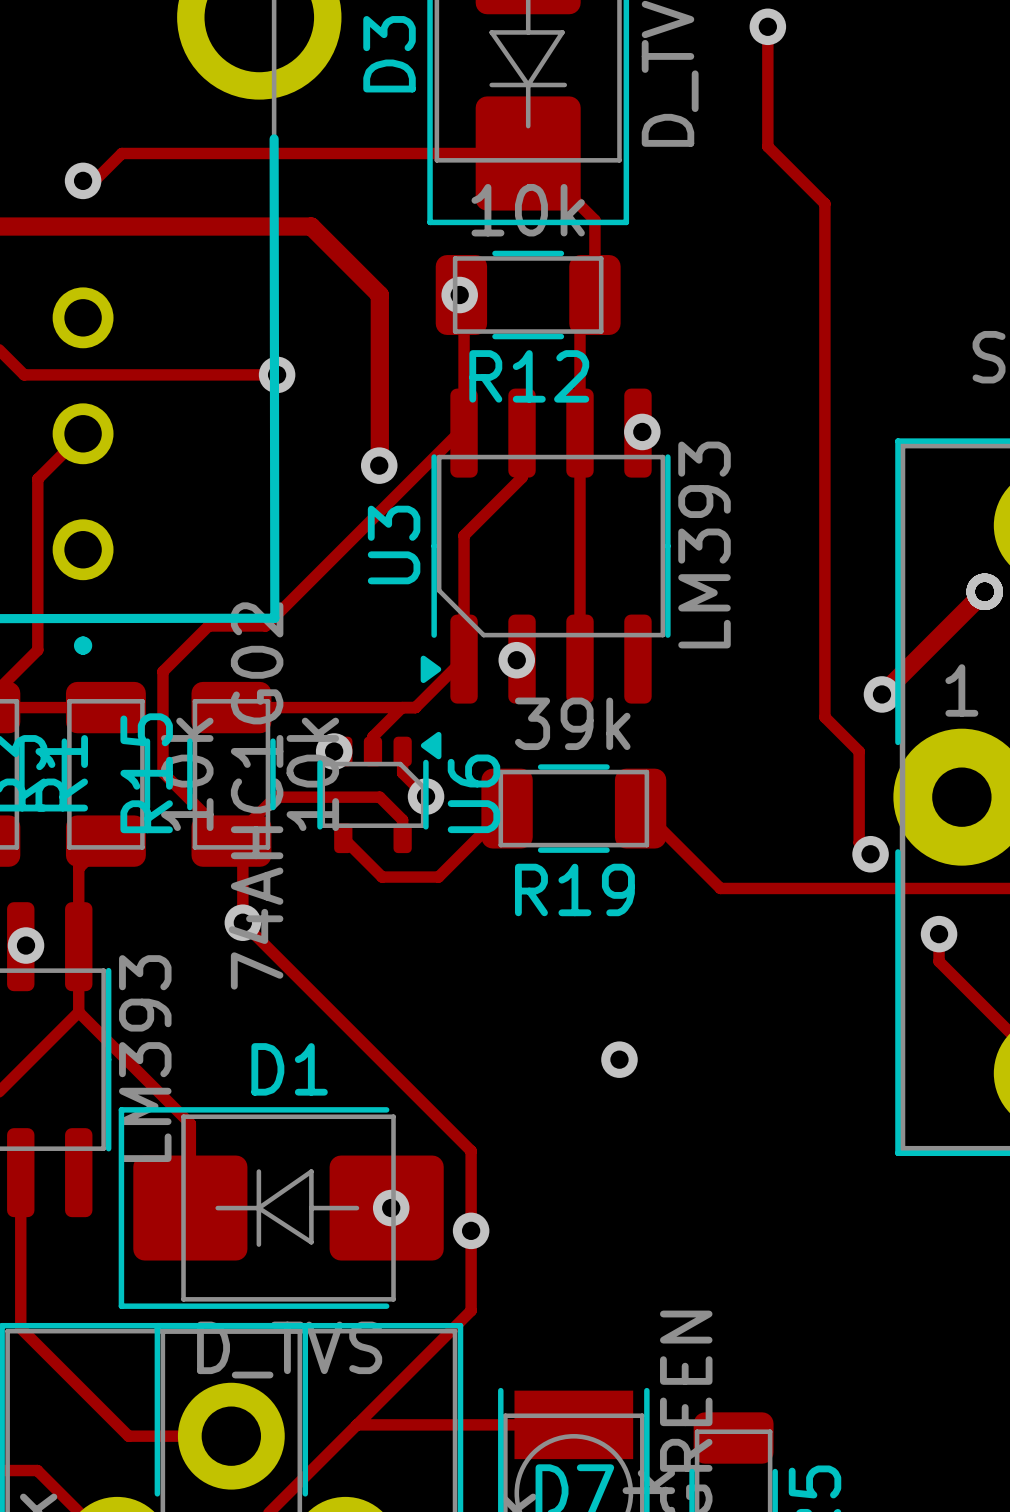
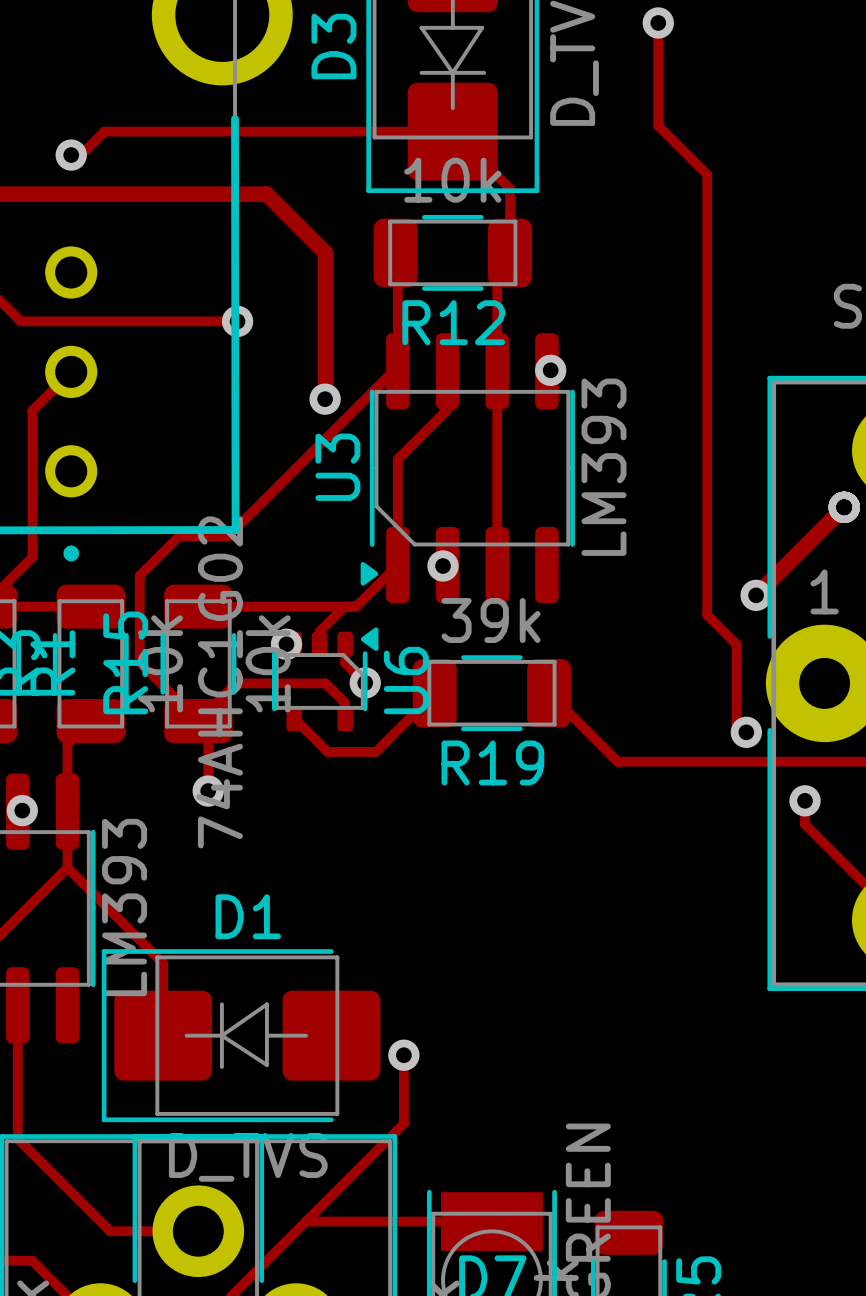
via: (459, 295) -> none
track: (242, 922) (471, 1150) (471, 1230) -> none
via: (619, 1059) -> none
via: (391, 1208) -> none

